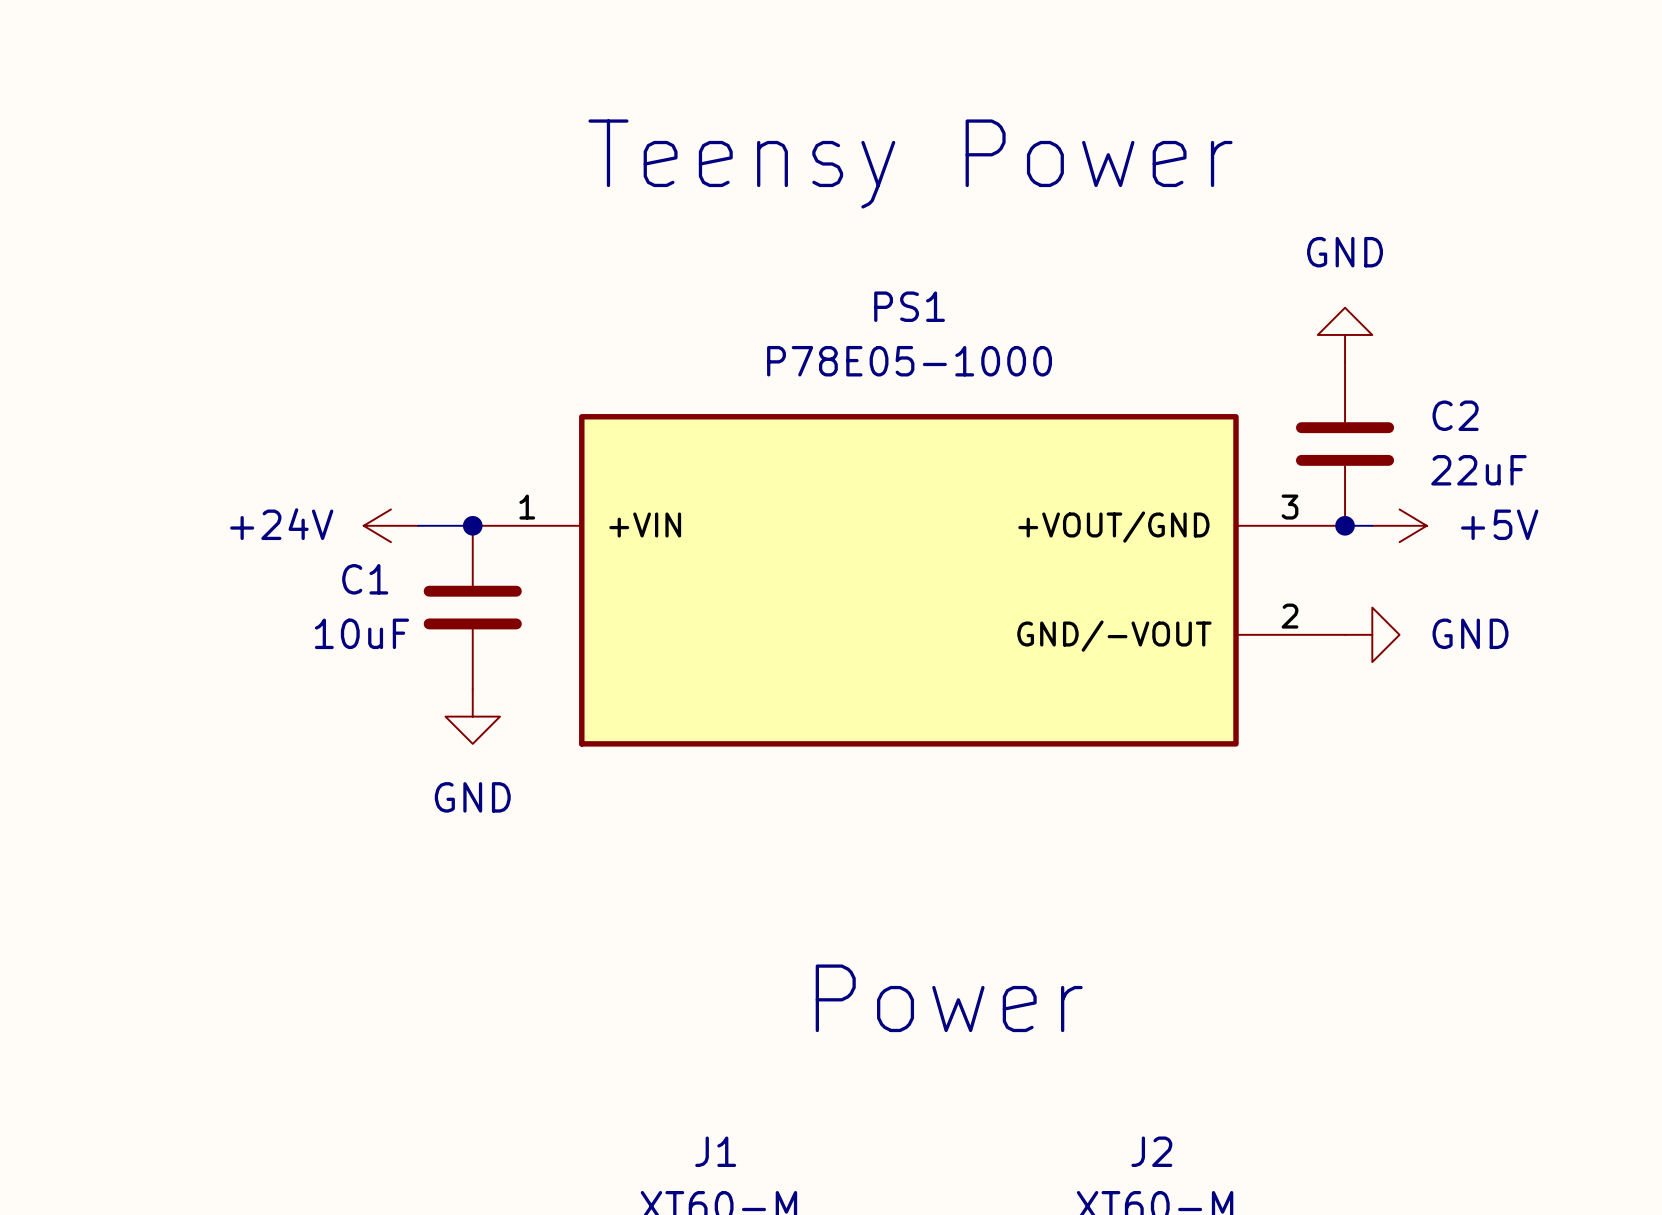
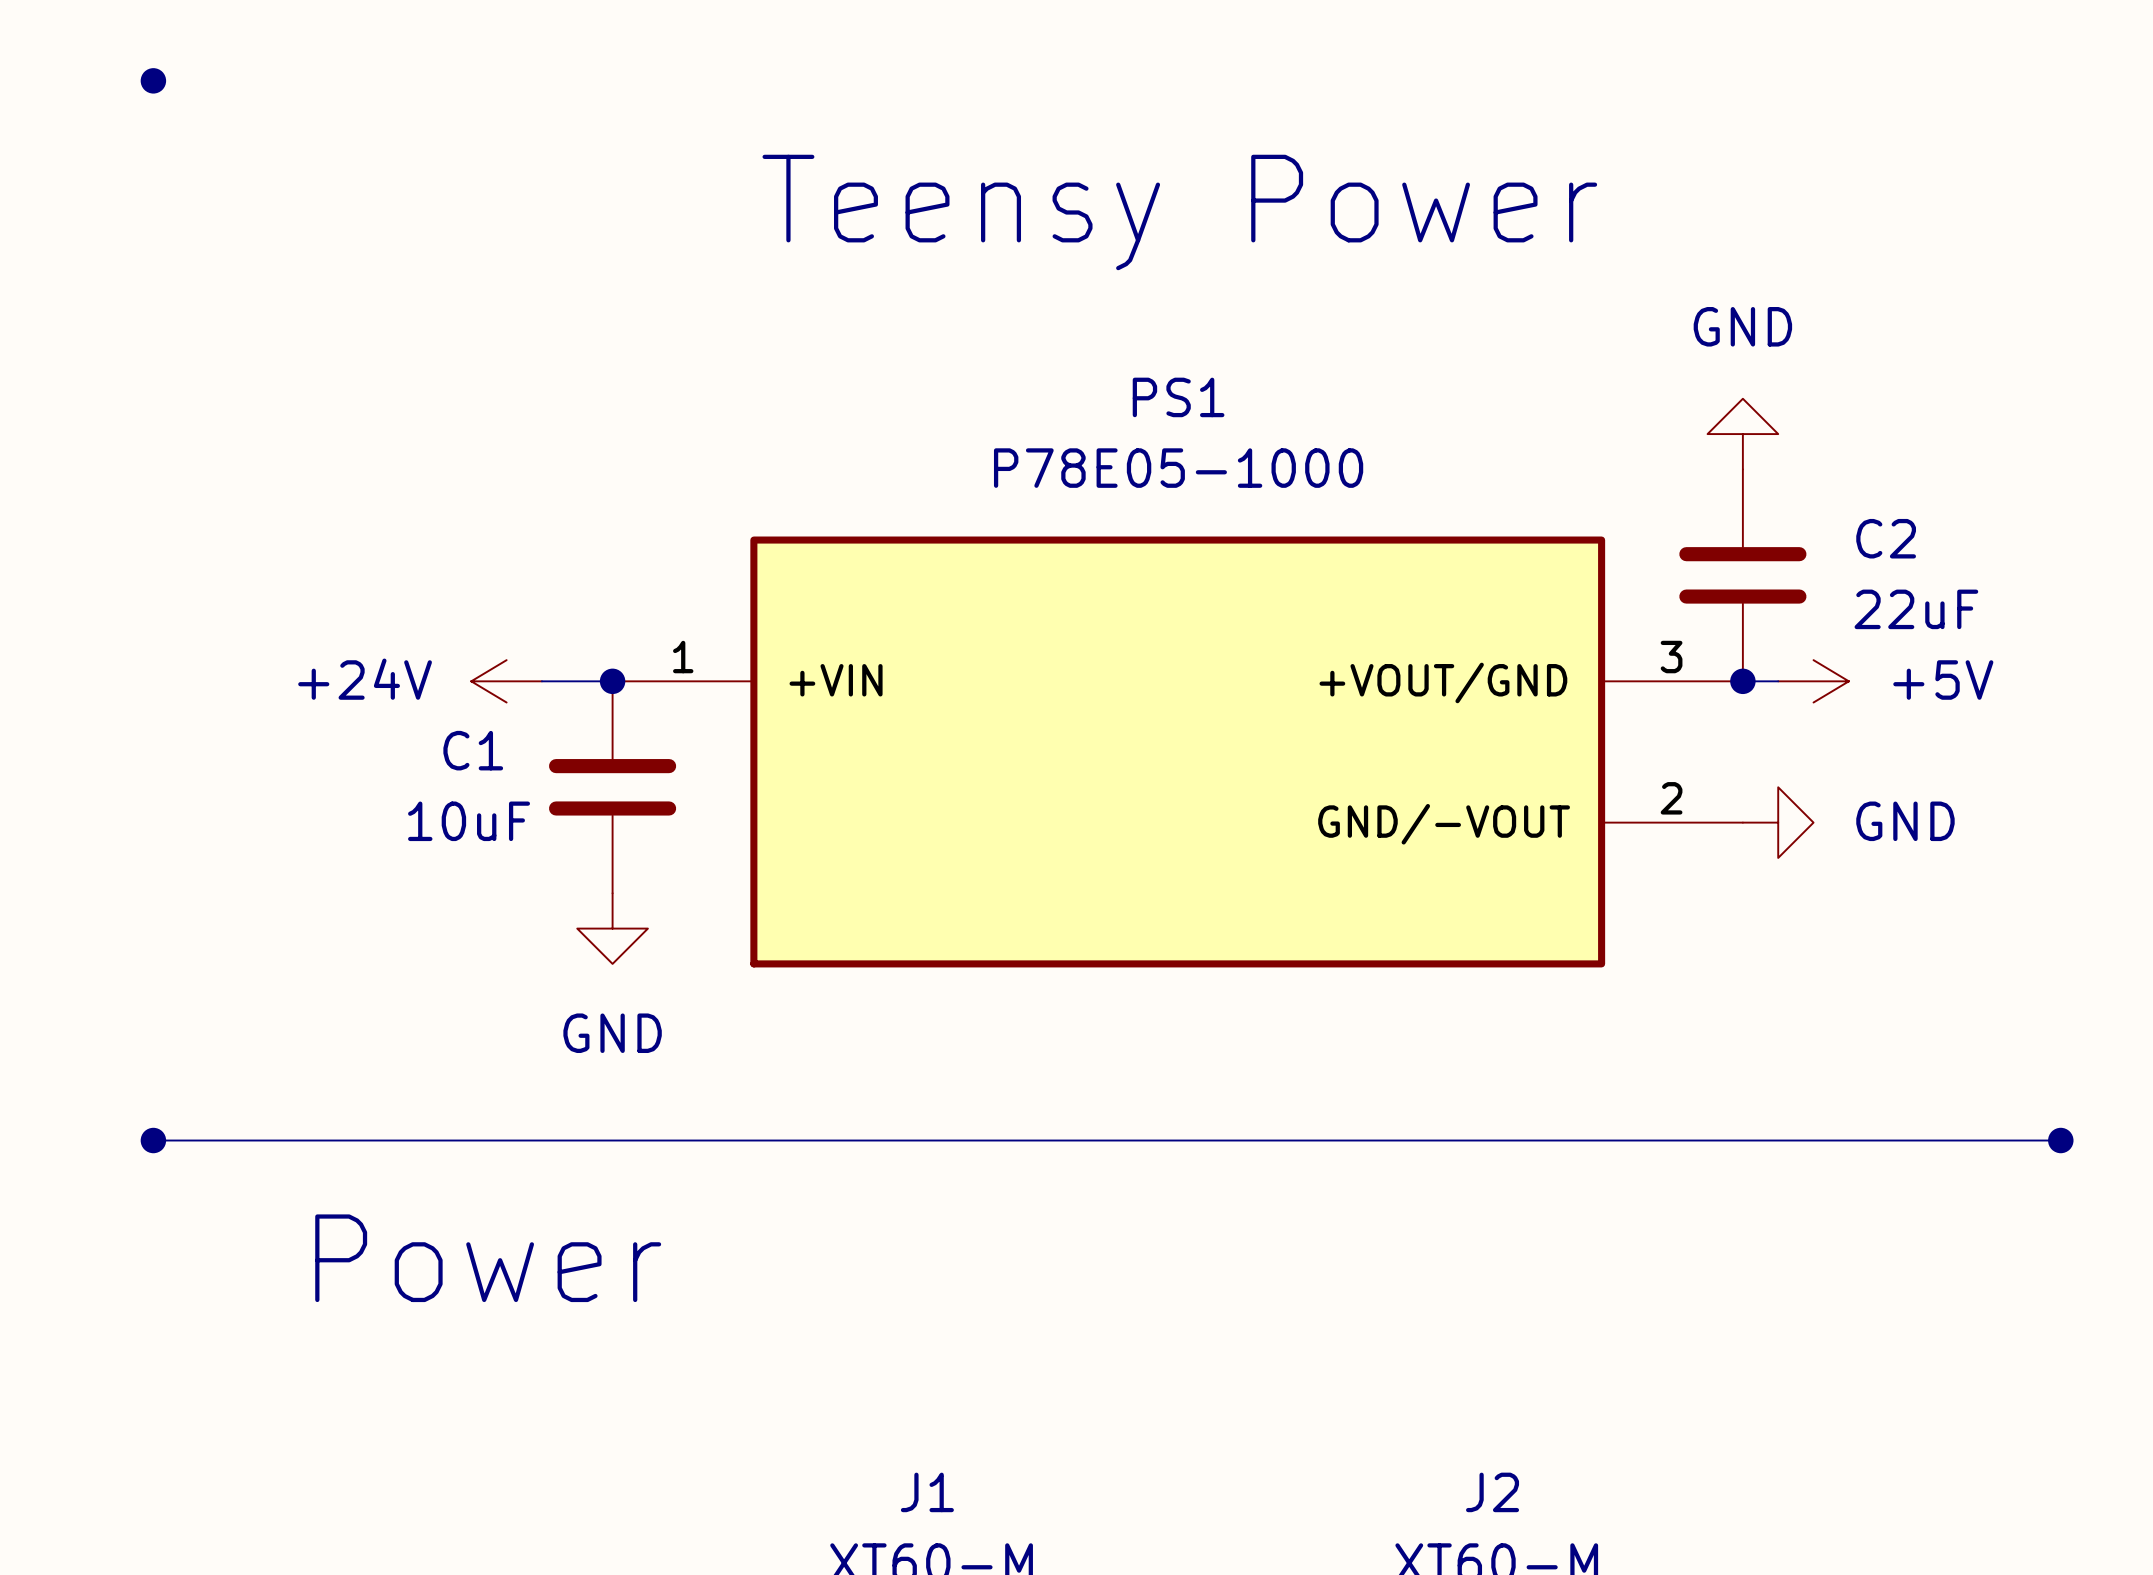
junction: none -> (153, 80)
bus: none -> (153, 1140) (2060, 1140)
junction: none -> (153, 1140)
junction: none -> (2060, 1140)
text: none -> Power (488, 1258)
text: Power (949, 998) -> none

